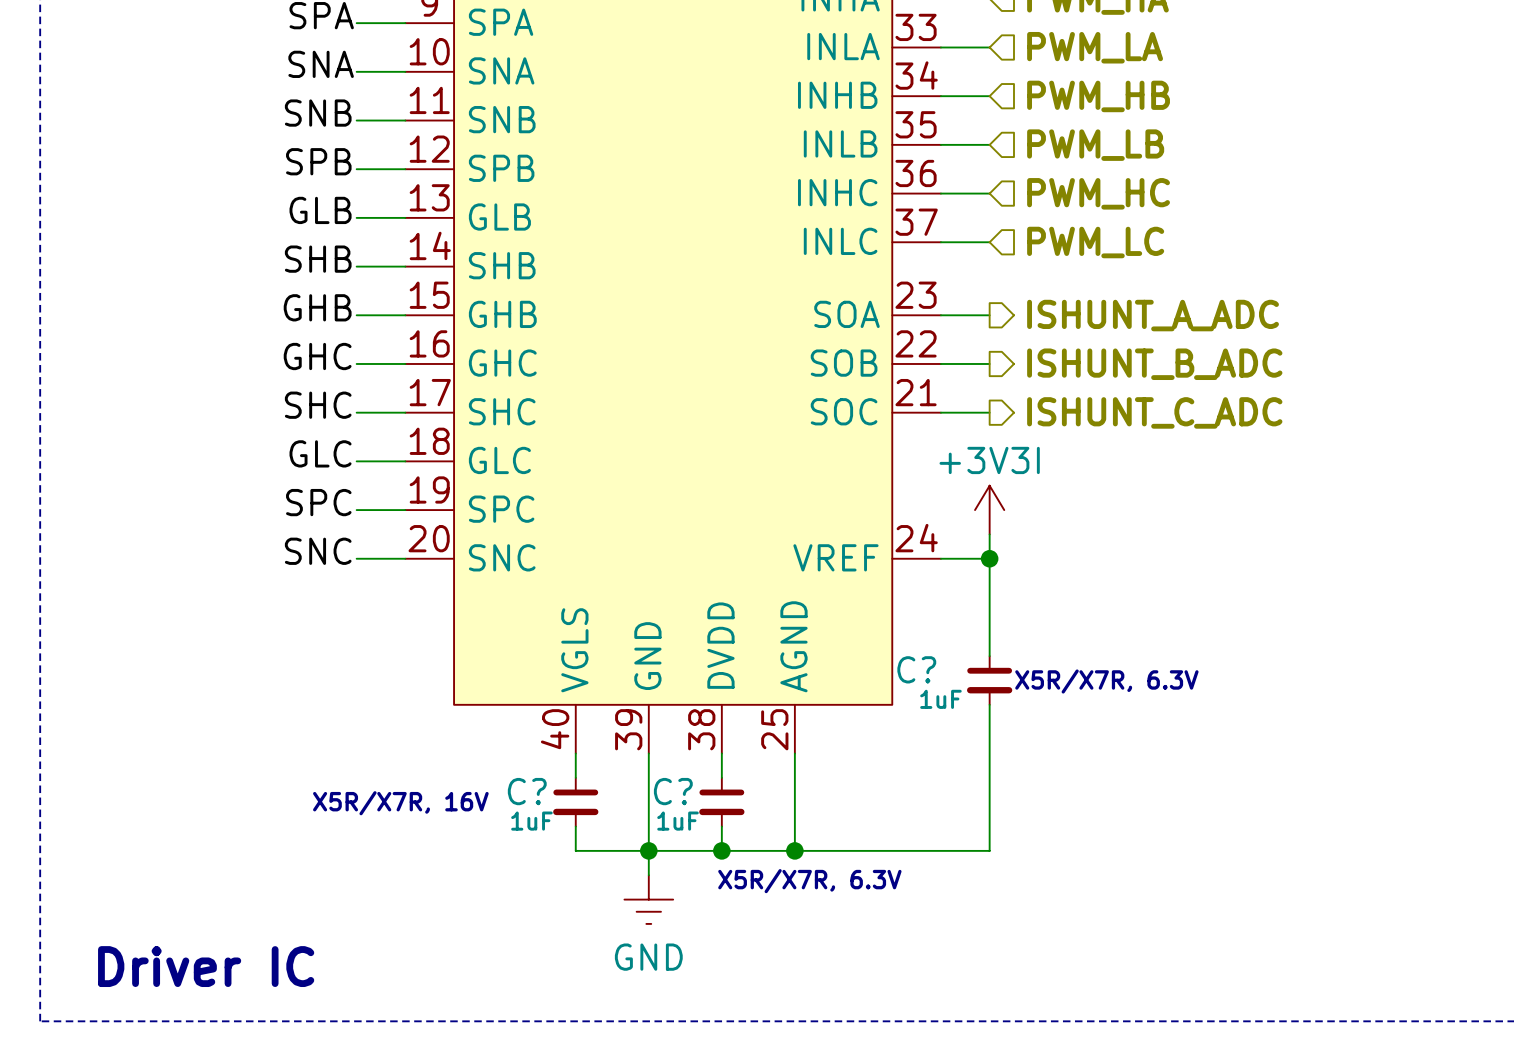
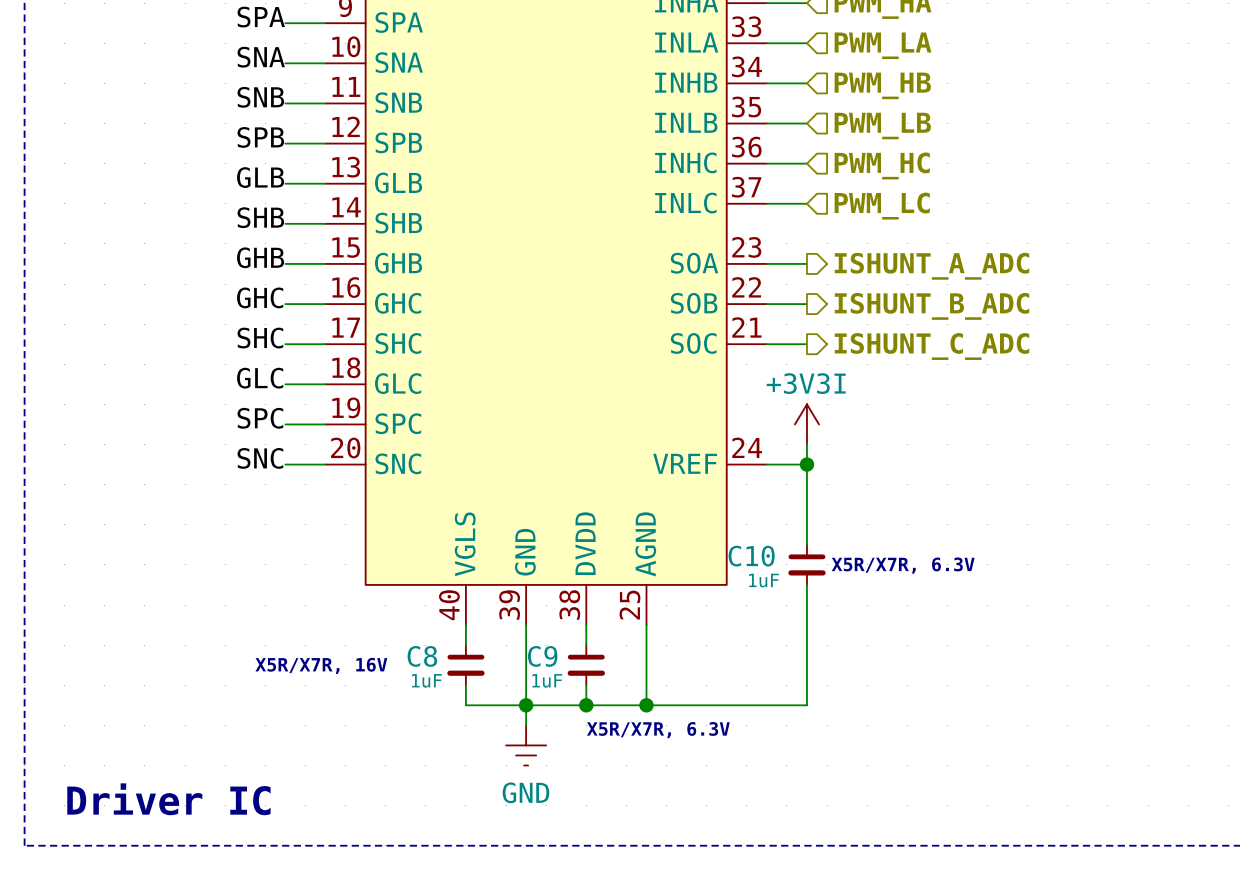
C? name: C? (916, 669) -> C10 (751, 556)
C? name: C? (527, 791) -> C8 (422, 656)
C? name: C? (673, 791) -> C9 (542, 656)

